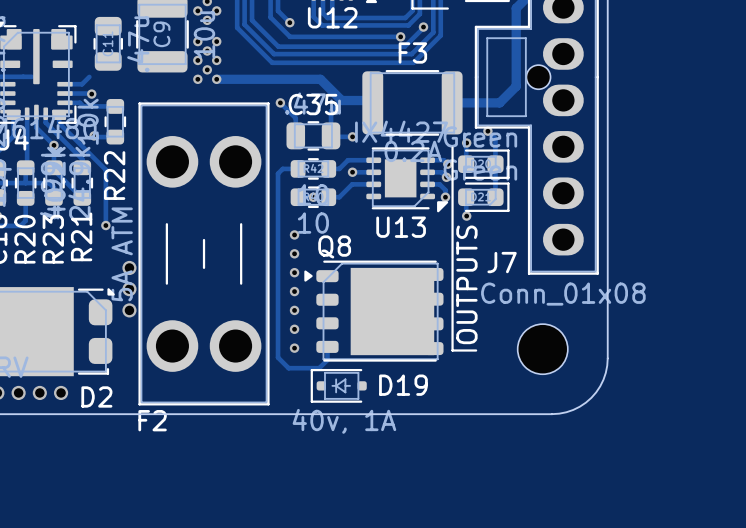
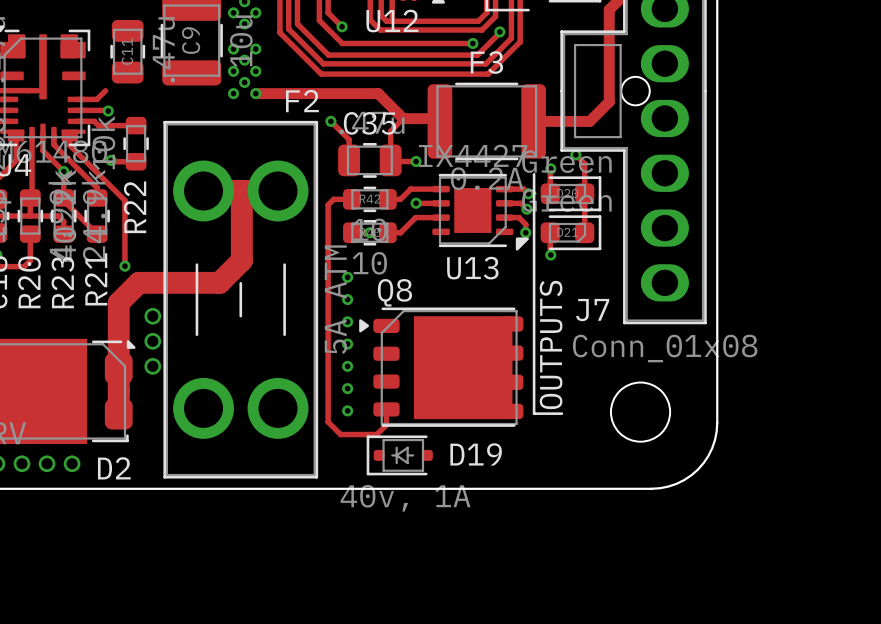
track: none -> (278, 191) (241, 191) (241, 260) (219, 282) (138, 282) (118, 302) (118, 414)
F2 value position: 5A ATM (122, 254) -> 5A ATM (335, 299)
F2 name position: F2 (152, 420) -> F2 (302, 101)

